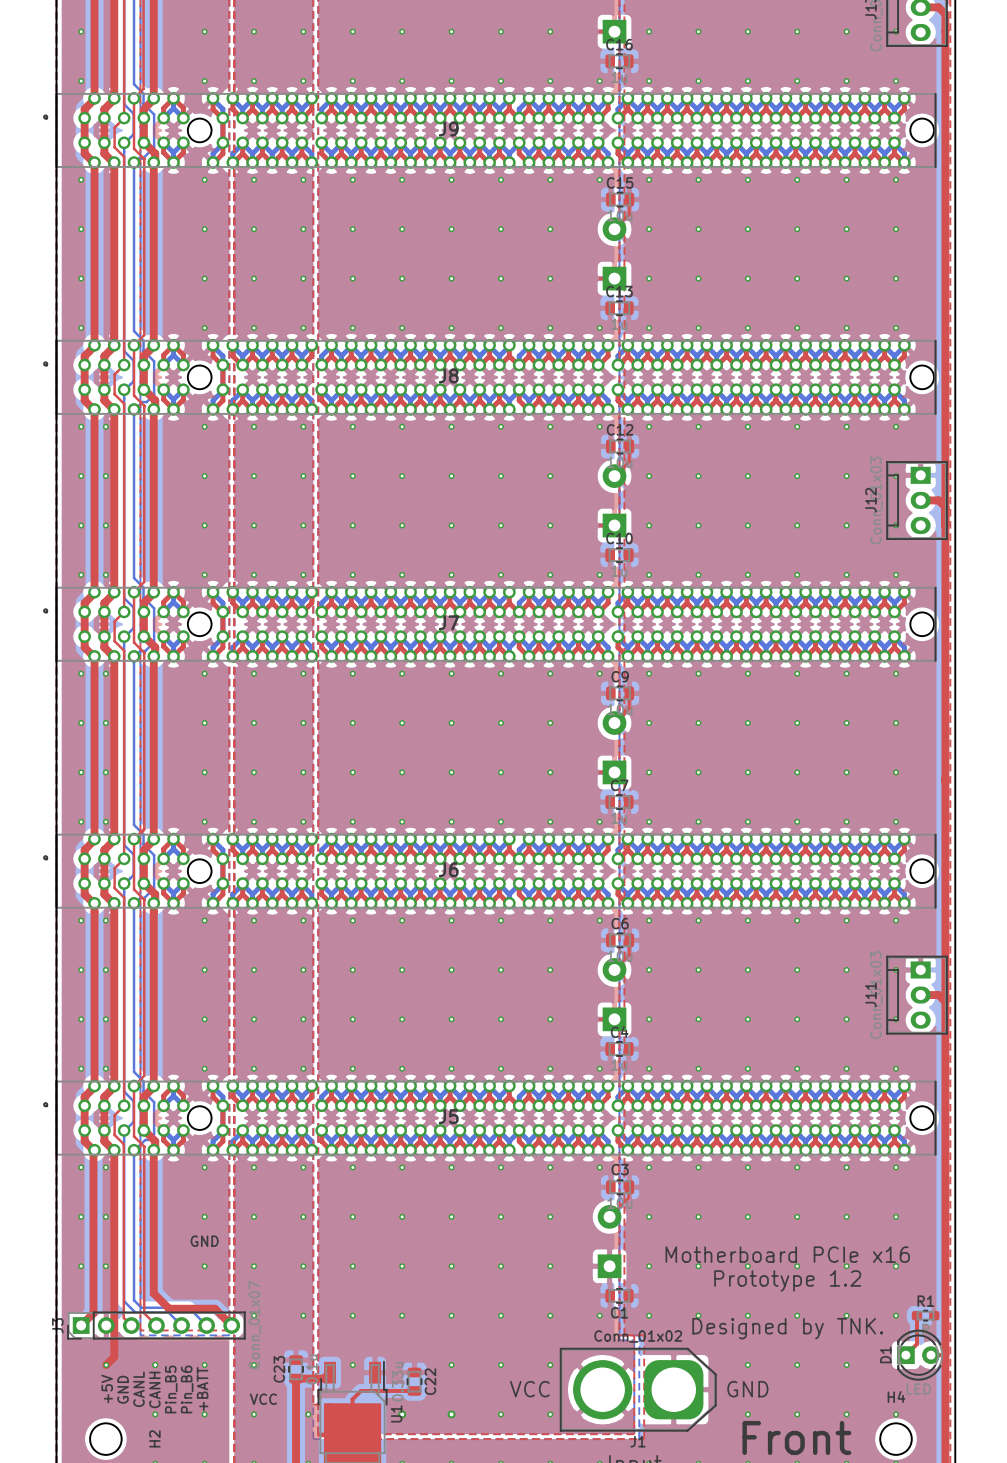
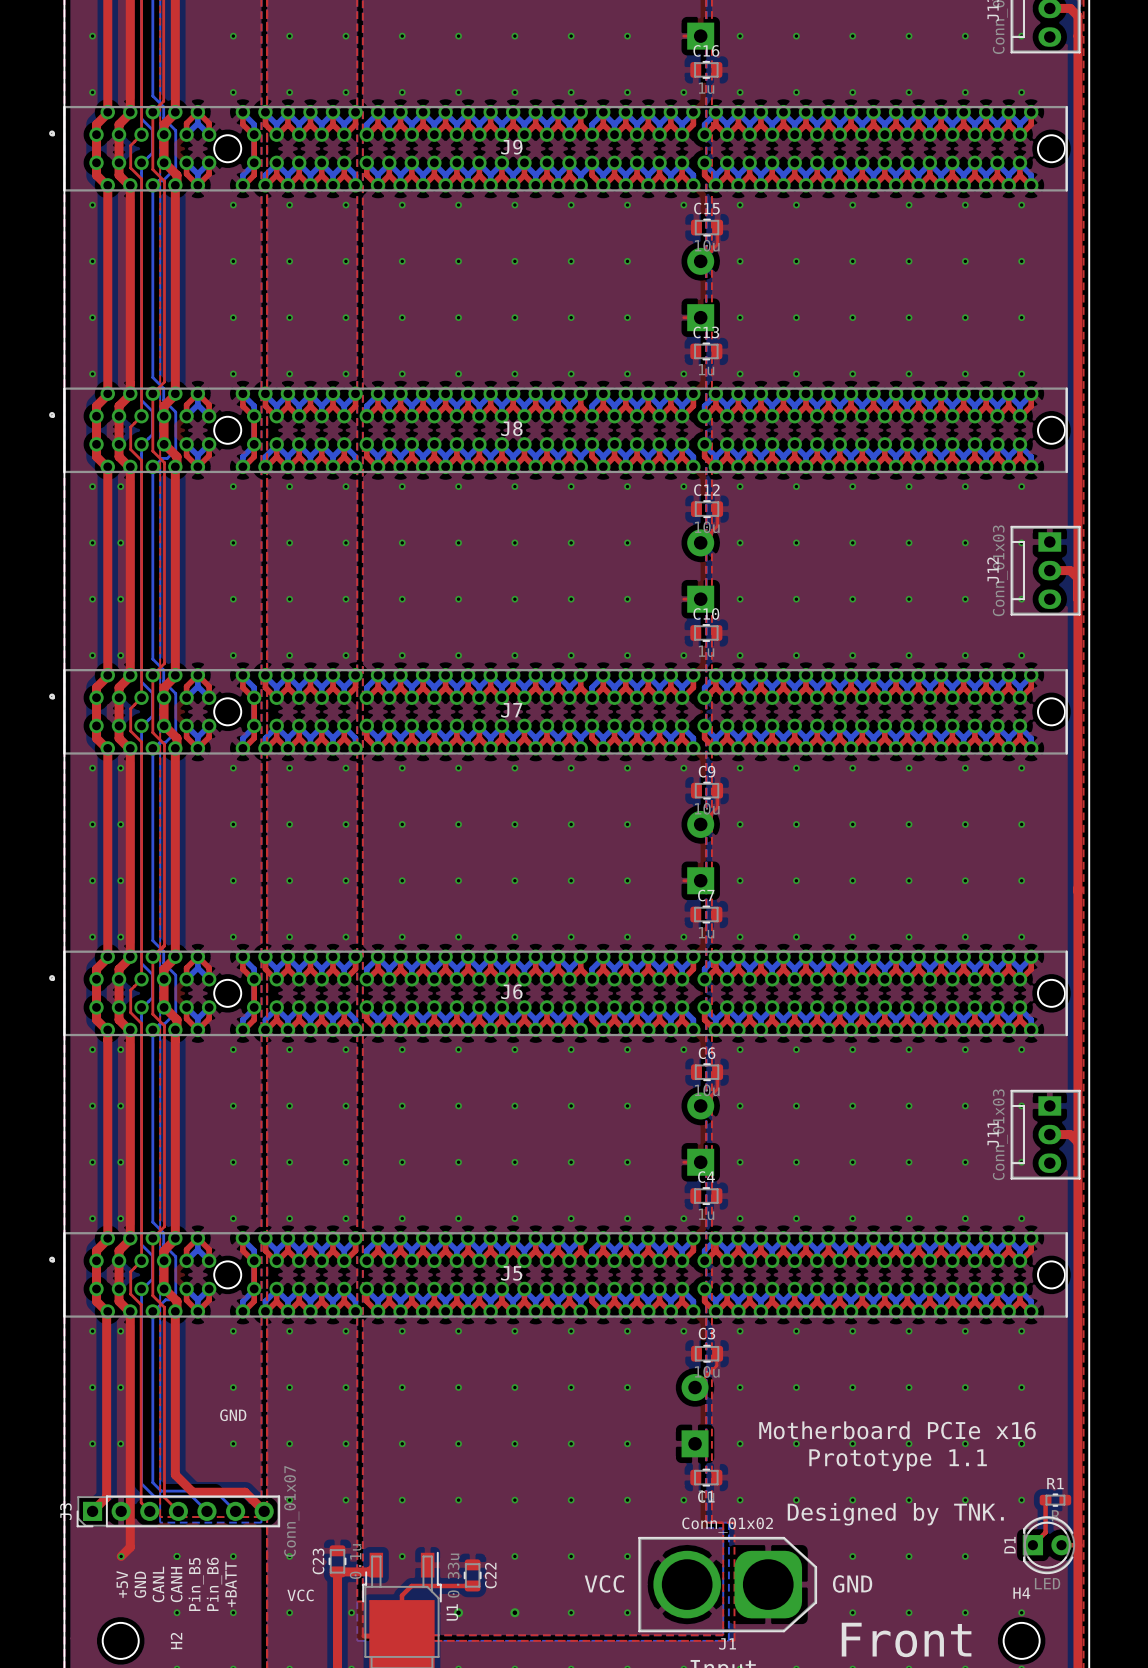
text: Prototype 1.2 (787, 1280) -> Prototype 1.1 (898, 1460)

